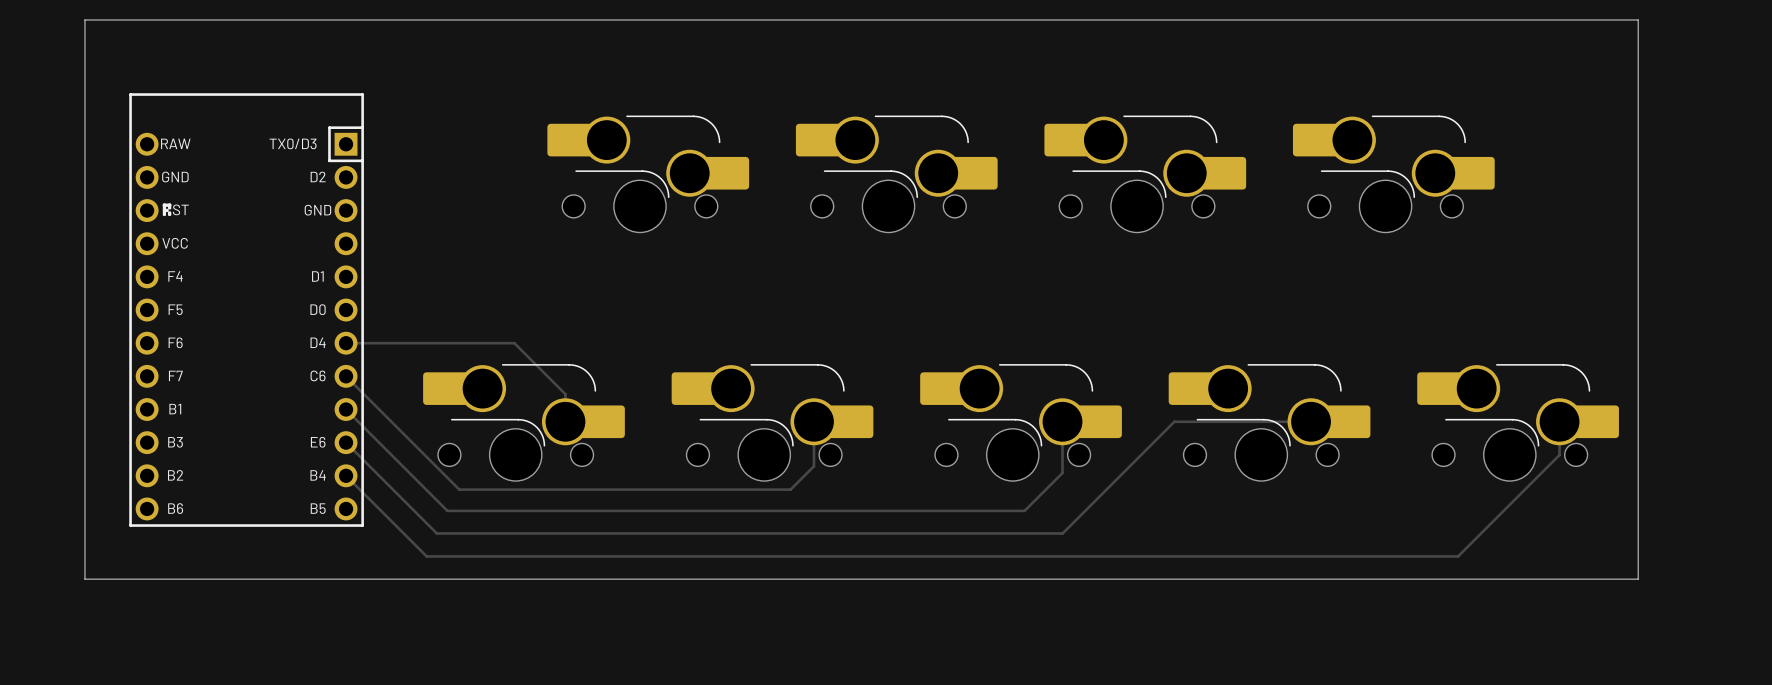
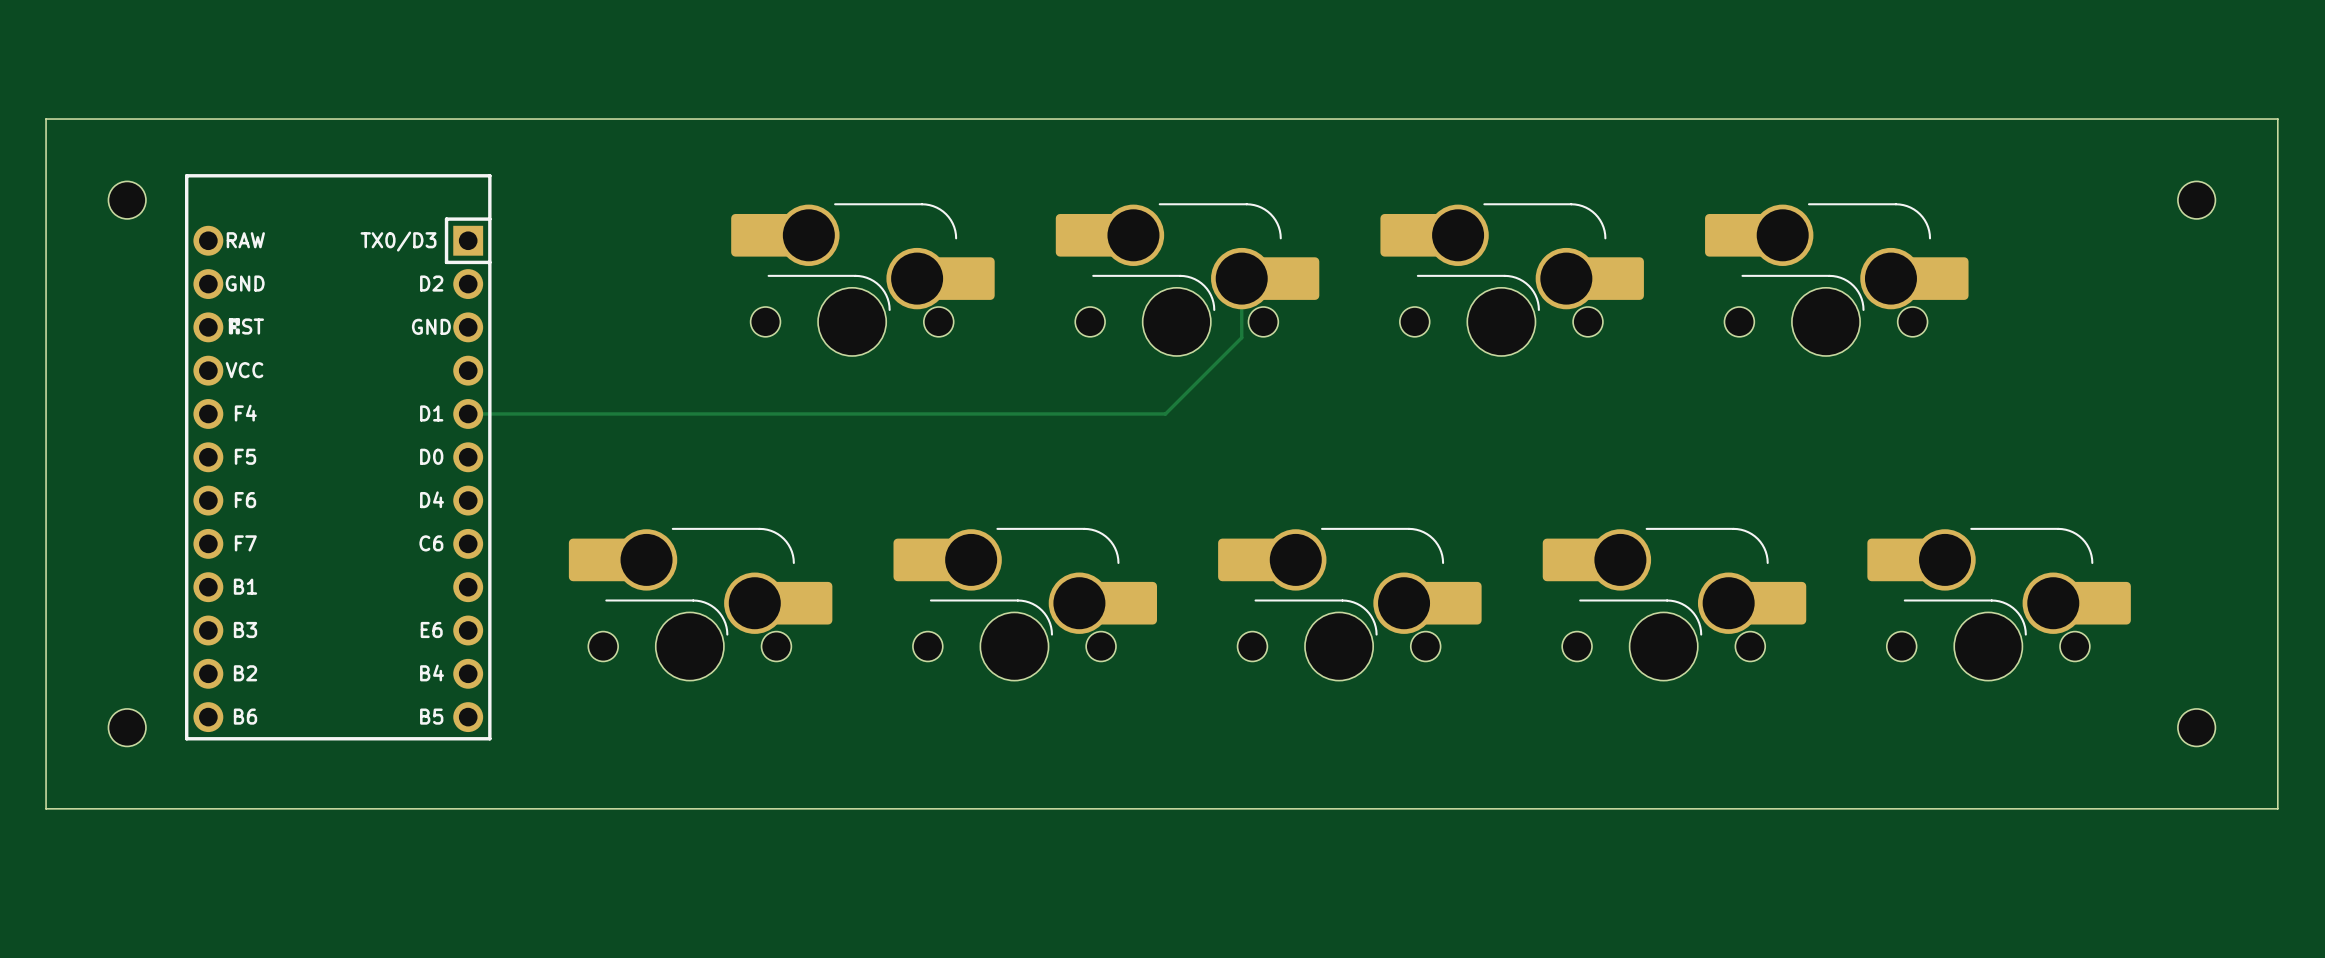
part: none -> (127, 200)
part: none -> (2196, 200)
track: none -> (1241, 278) (1241, 337) (1165, 413) (468, 413)
track: (346, 343) (514, 343) (565, 394) (565, 421) -> none
track: (346, 376) (459, 489) (790, 489) (813, 466) (813, 421) -> none
track: (346, 409) (447, 510) (1024, 510) (1062, 473) (1062, 421) -> none
track: (1311, 421) (1174, 421) (1062, 533) (436, 533) (346, 442) -> none
track: (1559, 421) (1559, 454) (1458, 556) (426, 556) (346, 475) -> none
part: none -> (127, 727)
part: none -> (2196, 727)
board edge: (1638, 579) (1638, 20) (84, 20) (84, 579) -> (2156, 808) (2277, 808) (2277, 119) (46, 119) (46, 808) (127, 808)

